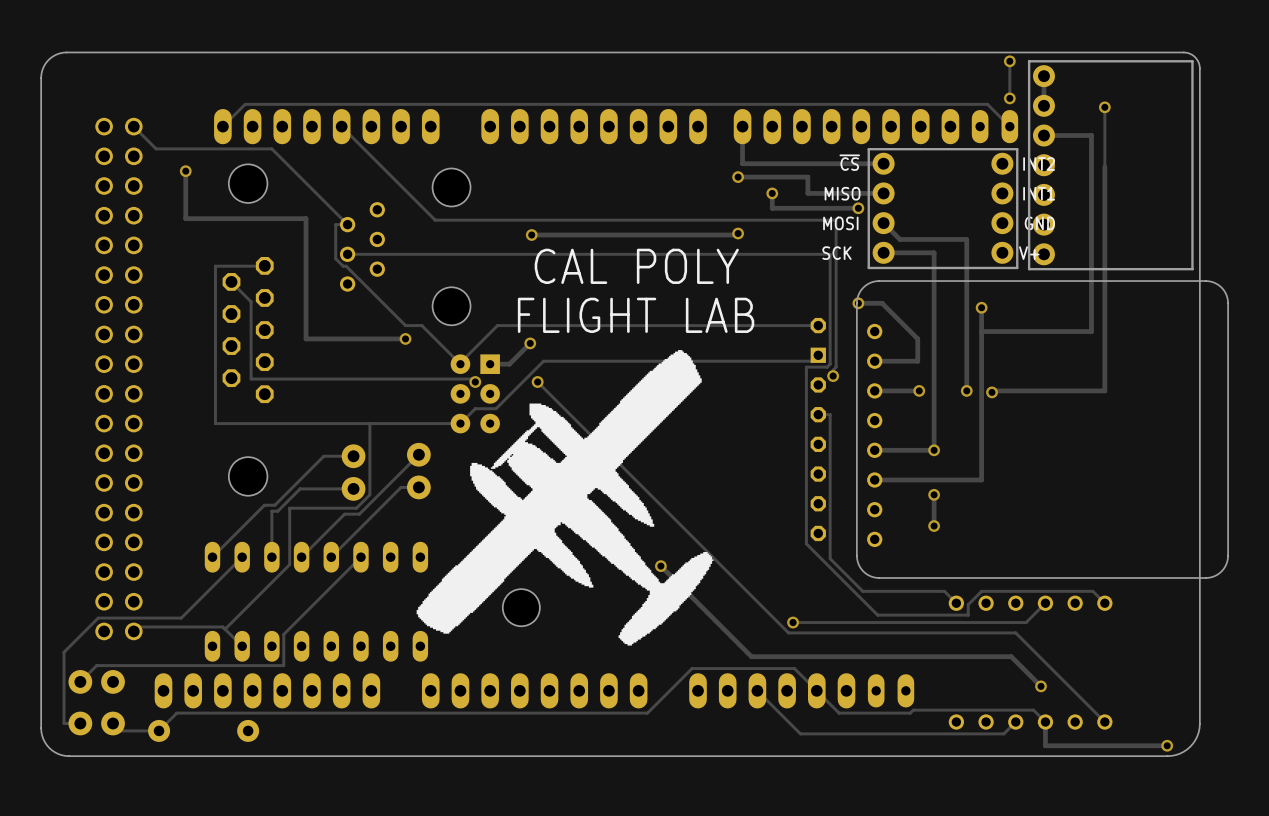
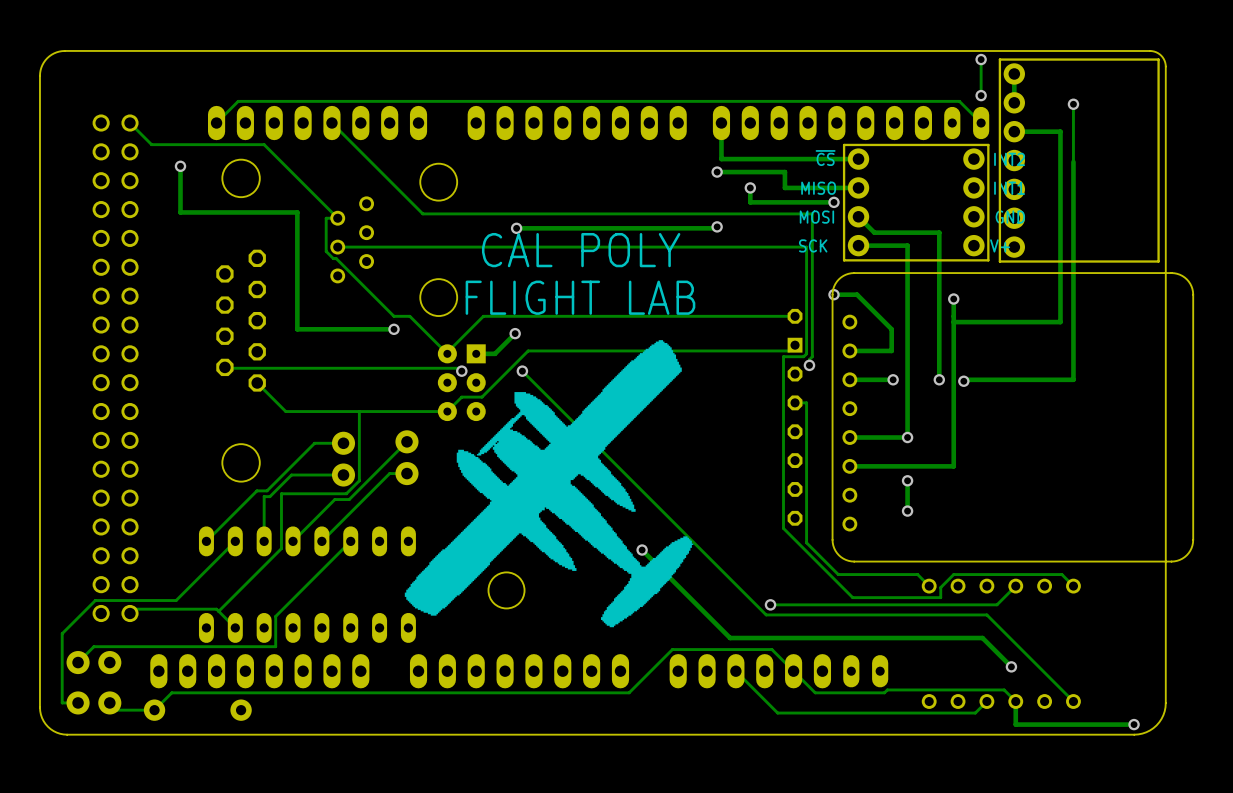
track: (264, 265) (215, 266) (215, 423) (294, 423) -> (257, 382) (285, 411)
text position: CAL POLY (636, 266) -> CAL POLY (581, 250)
track: (231, 281) (251, 301) (251, 379) -> (224, 367) (243, 368)
text position: FLIGHT LAB (636, 315) -> FLIGHT LAB (580, 297)

